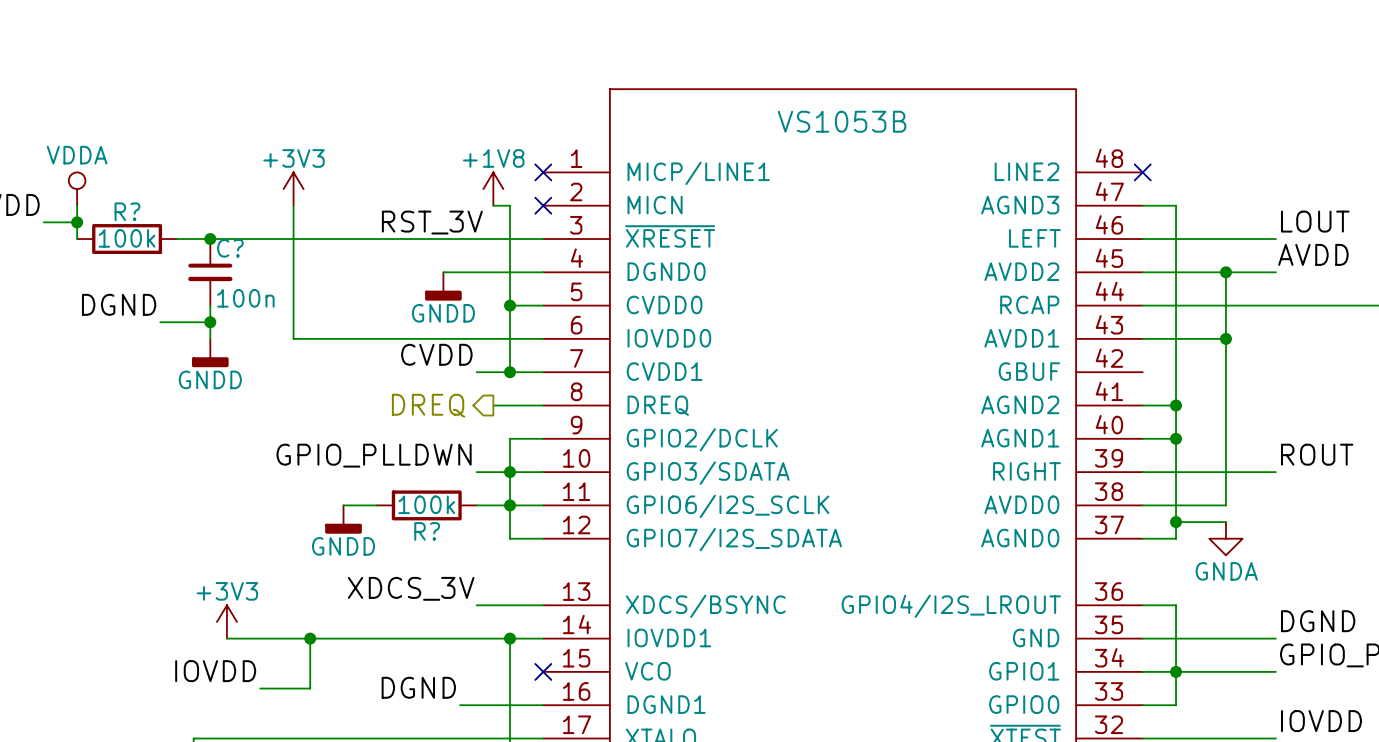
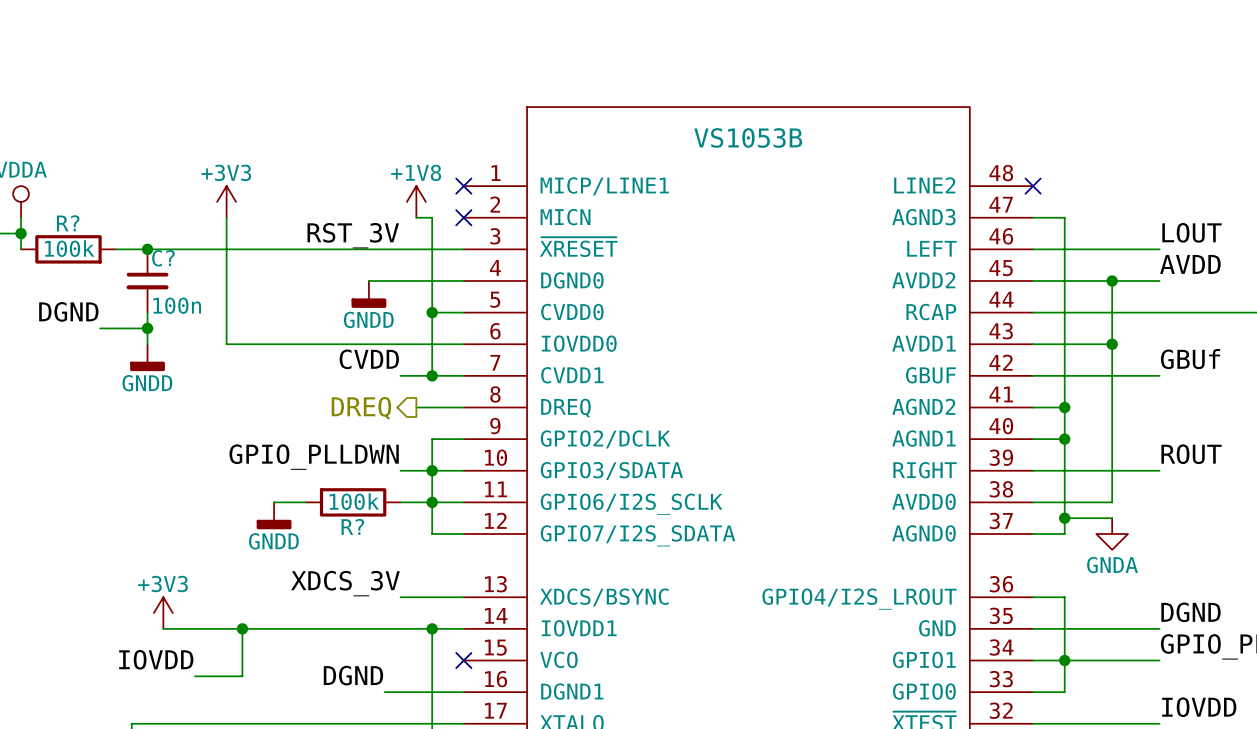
label: none -> GBUf (1190, 359)
wire: none -> (1033, 375) (1159, 375)

